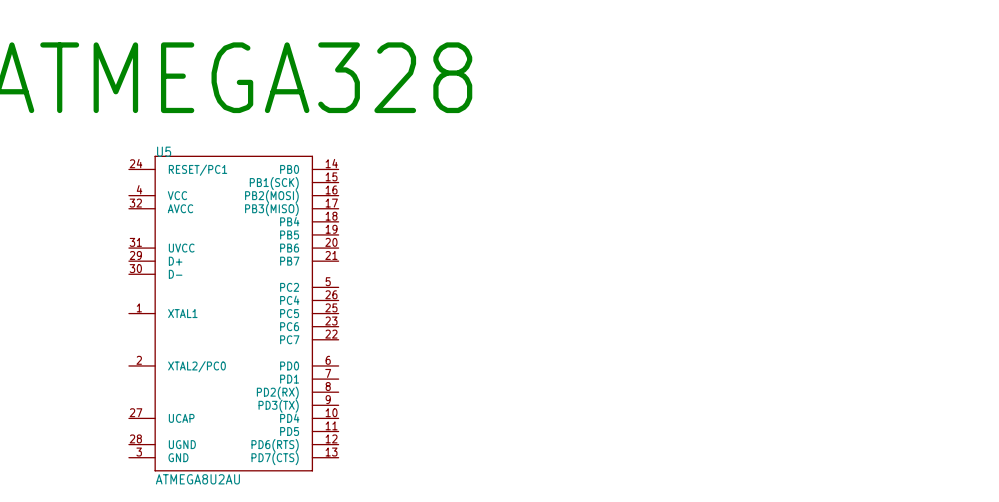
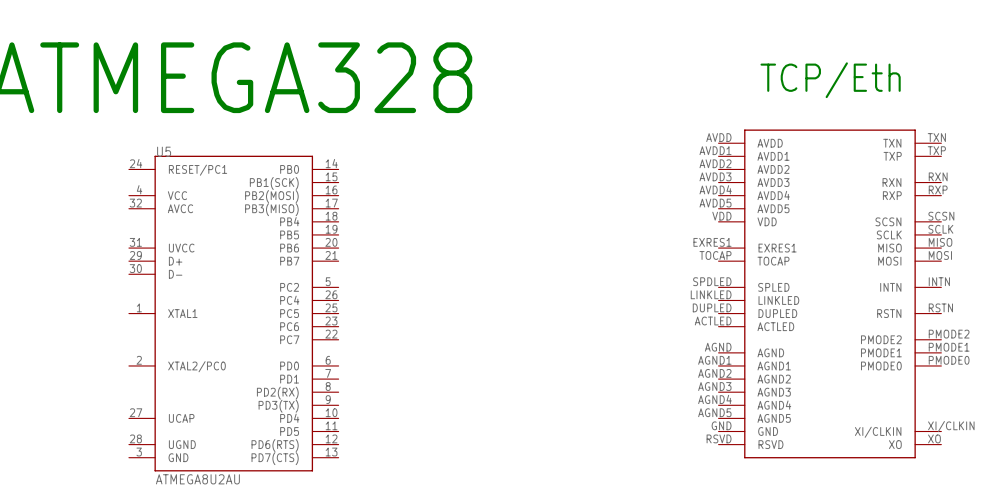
text: none -> TCP/Eth (830, 80)
part: none -> (829, 293)

